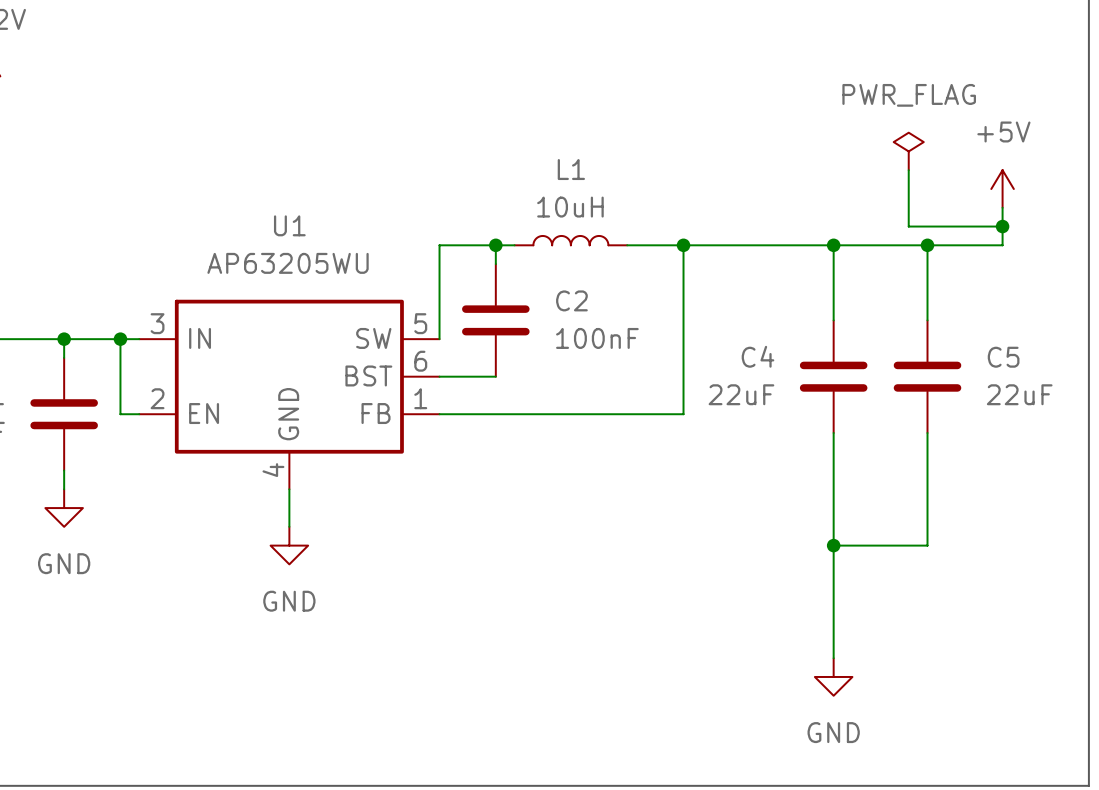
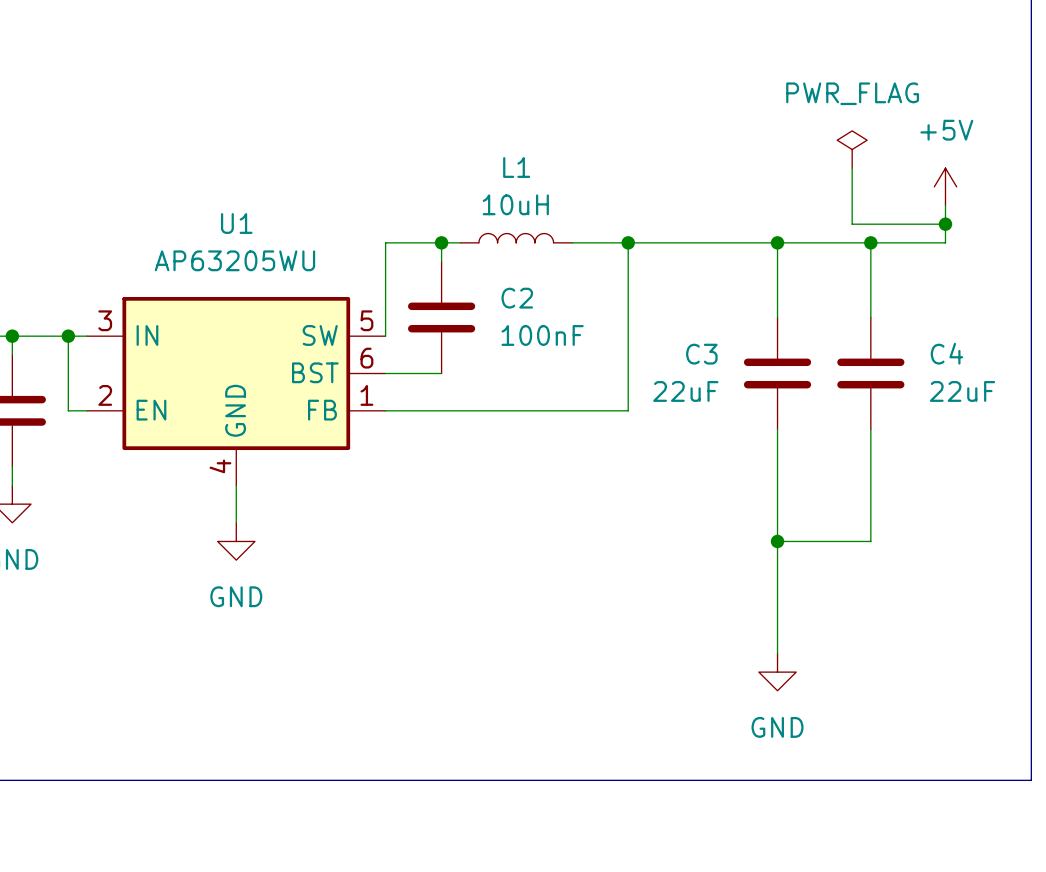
C4 name: C4 (758, 356) -> C3 (701, 354)
C5 name: C5 (1003, 357) -> C4 (946, 353)

